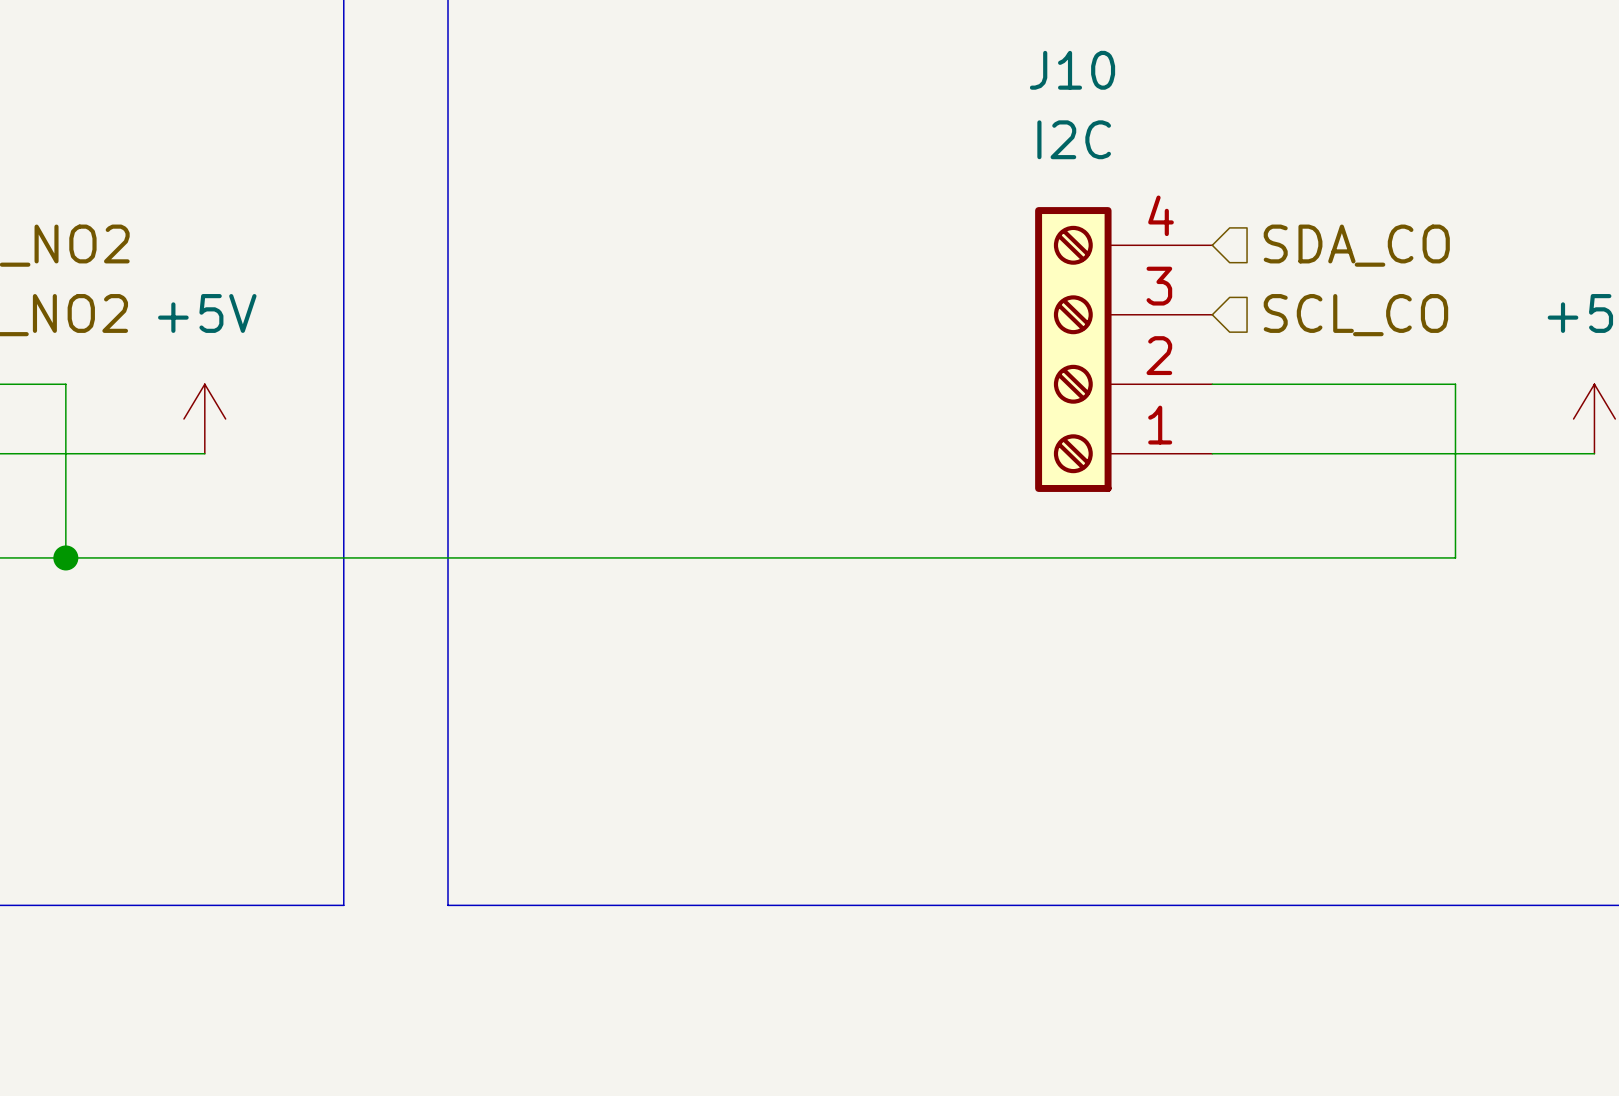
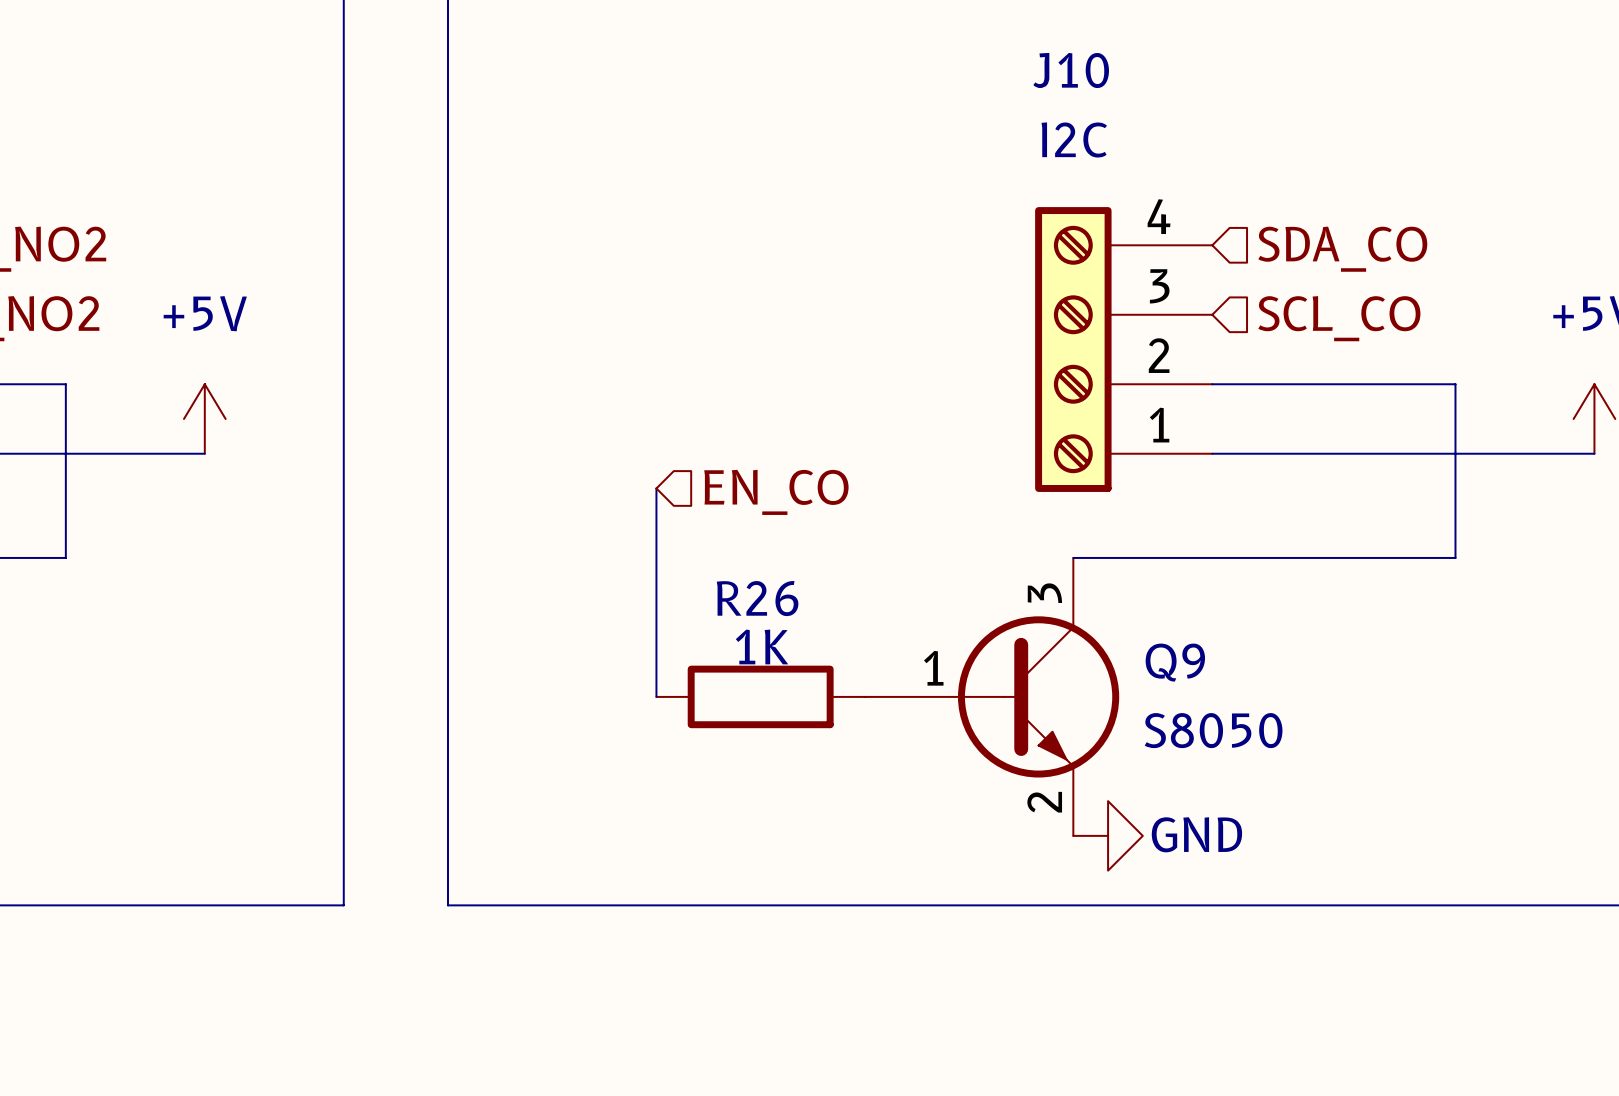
wire: none -> (656, 488) (656, 696)
hierarchical label: none -> EN_CO (776, 492)
wire: (65, 557) (1073, 557) -> none
junction: (65, 557) -> none
R26: none -> 1K (760, 696)
Q9: none -> S8050 (992, 696)
power symbol: none -> GND (1108, 835)

